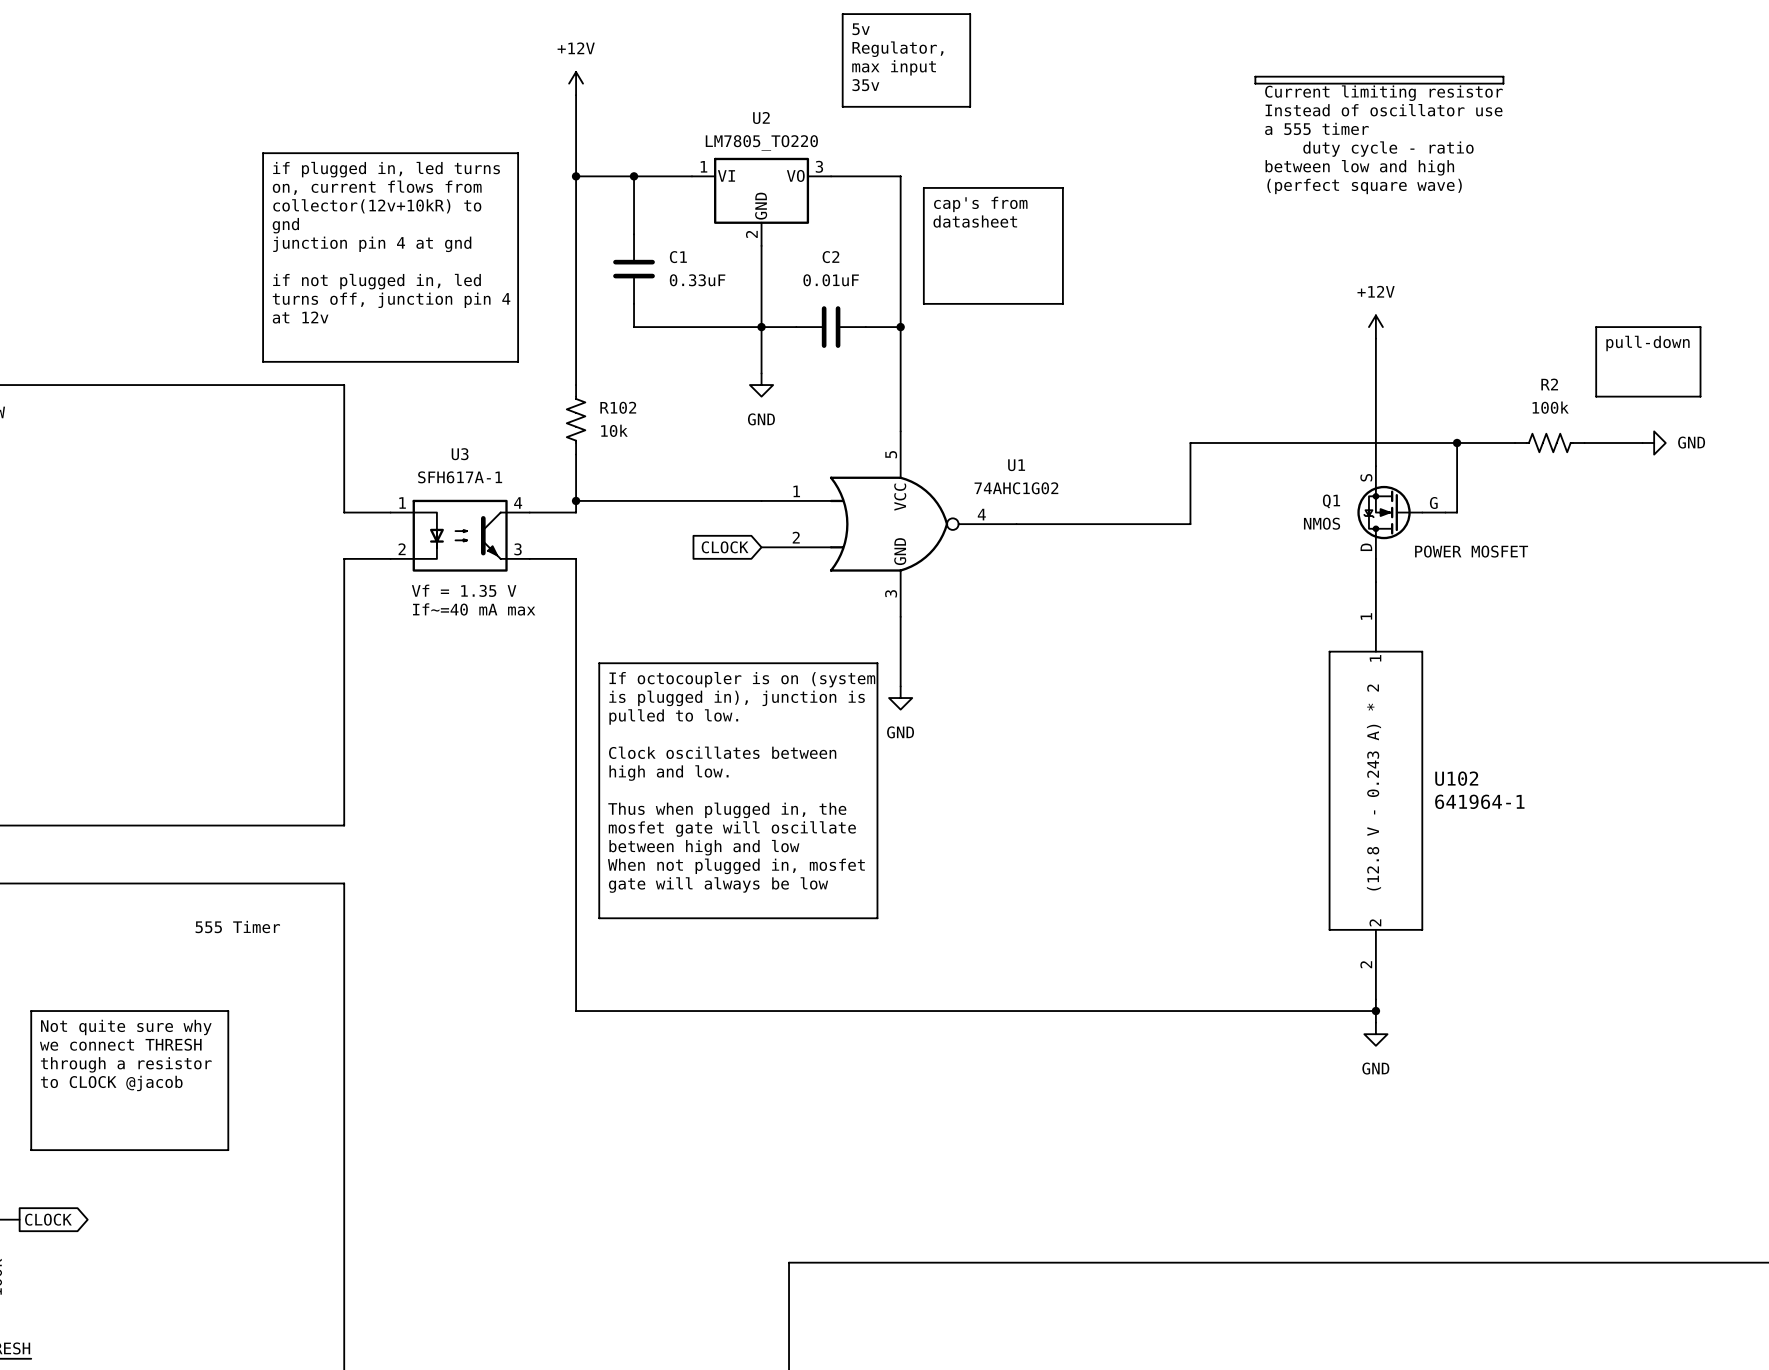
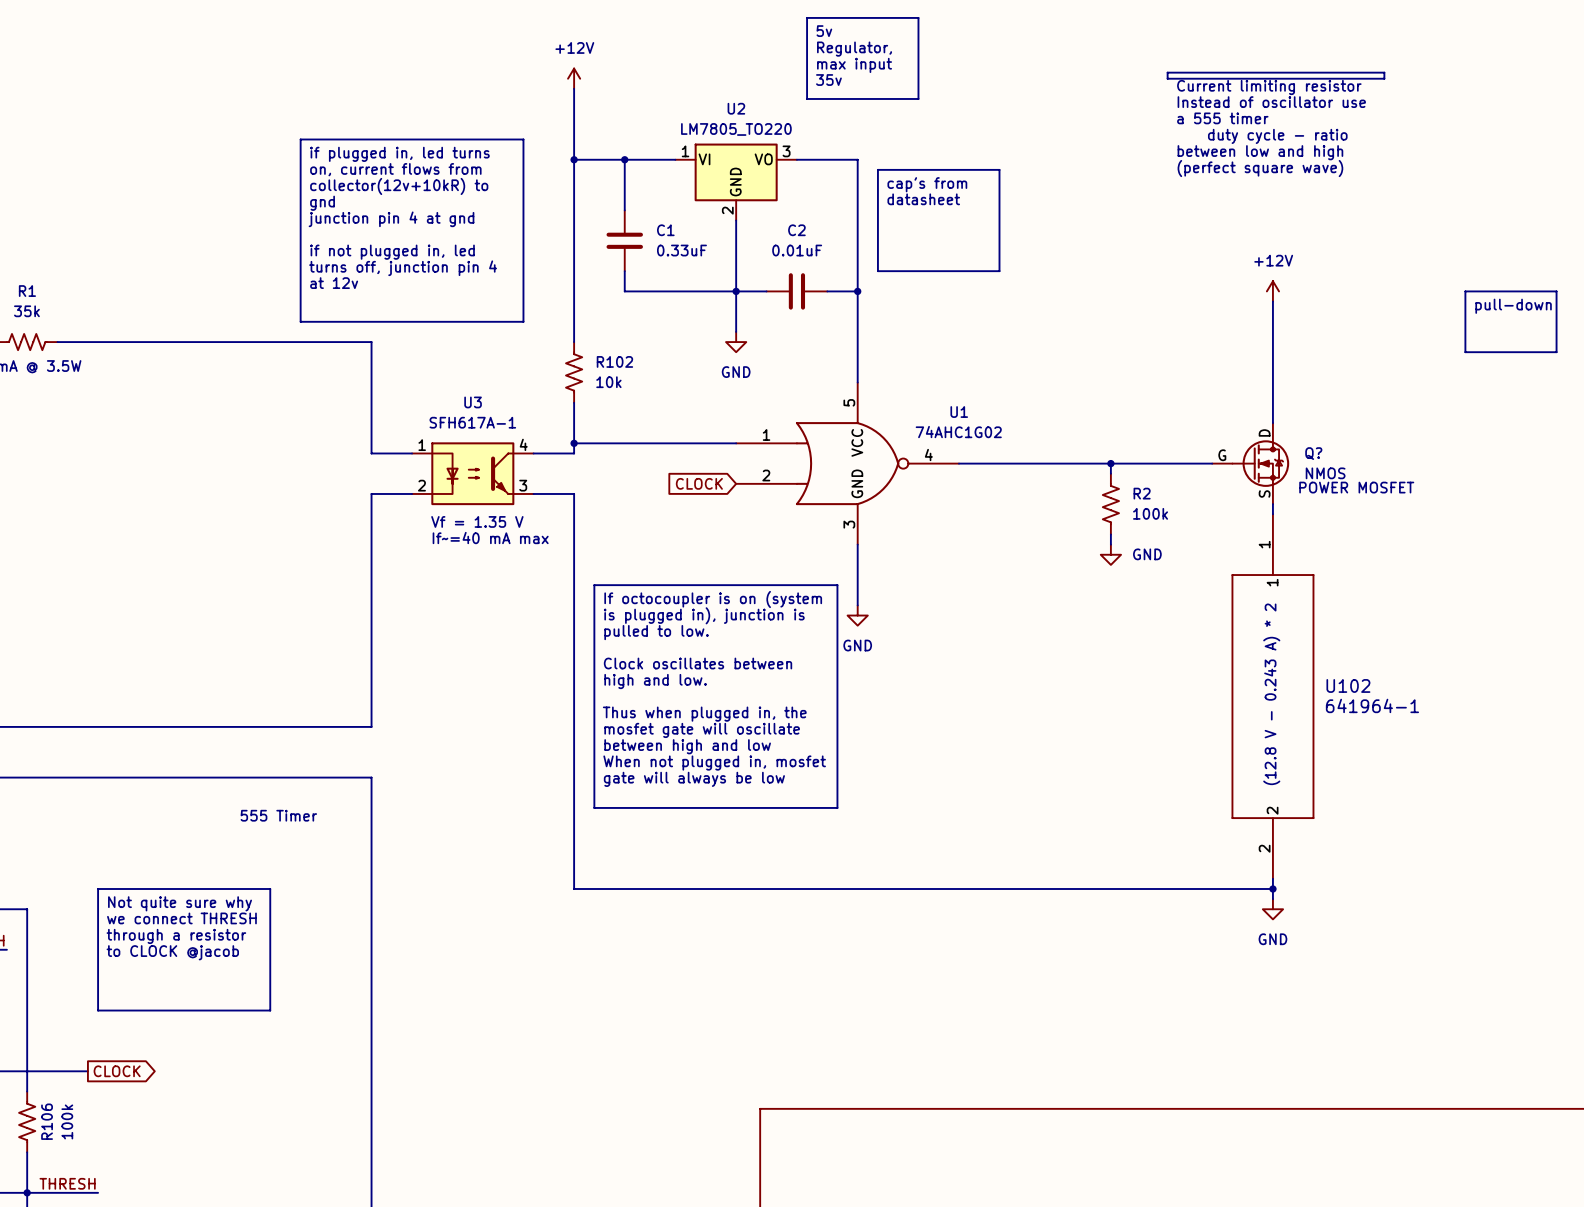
R2 name position: R2 (1549, 384) -> R2 (1142, 493)
wire: (1457, 442) (1457, 512) (1445, 512) -> none
junction: (1457, 442) -> none
wire: (1515, 442) (1190, 442) (1190, 524) -> none
R2 rotation: 0° (1549, 442) -> 90° clockwise (1110, 504)
R2 position: (1549, 442) -> (1110, 504)
wire: (1584, 442) (1642, 442) -> none
power symbol: GND (1654, 442) -> none
Q1: NMOS (1401, 512) -> none
junction: none -> (1110, 463)
wire: none -> (1212, 463) (1110, 463) (1110, 473)
Q?: none -> NMOS (1250, 463)
wire: none -> (1110, 534) (1110, 544)
power symbol: none -> GND (1110, 554)

